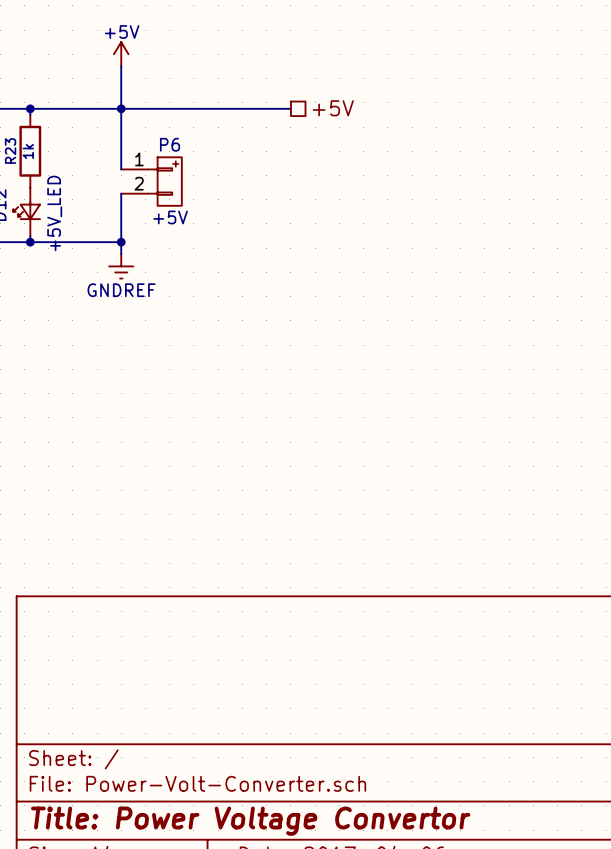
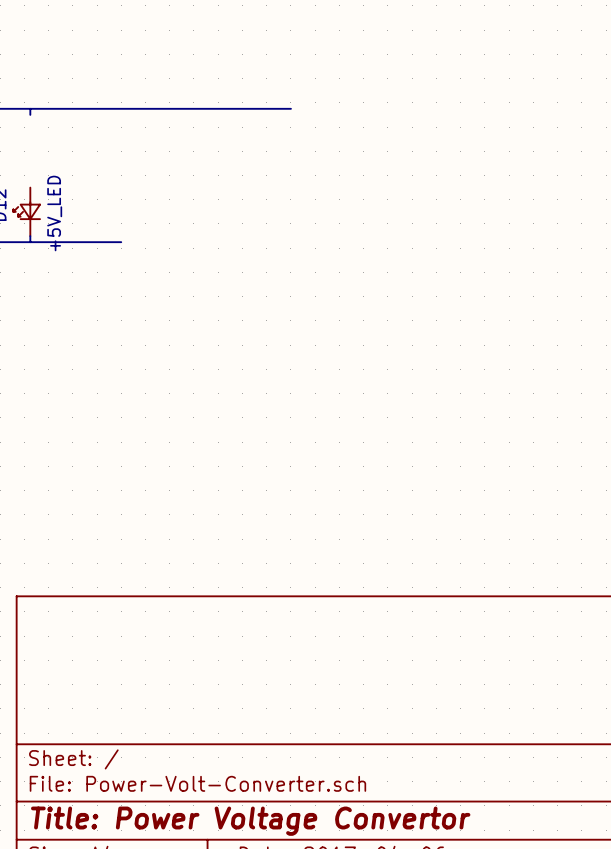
power symbol: +5V (121, 54) -> none
wire: (121, 66) (121, 169) -> none
junction: (30, 108) -> none
junction: (121, 108) -> none
hierarchical label: +5V (333, 108) -> none
R23: 1k (30, 151) -> none
P6: +5V (151, 181) -> none
wire: (121, 193) (121, 254) -> none
junction: (30, 242) -> none
junction: (121, 242) -> none
power symbol: GNDREF (121, 266) -> none

